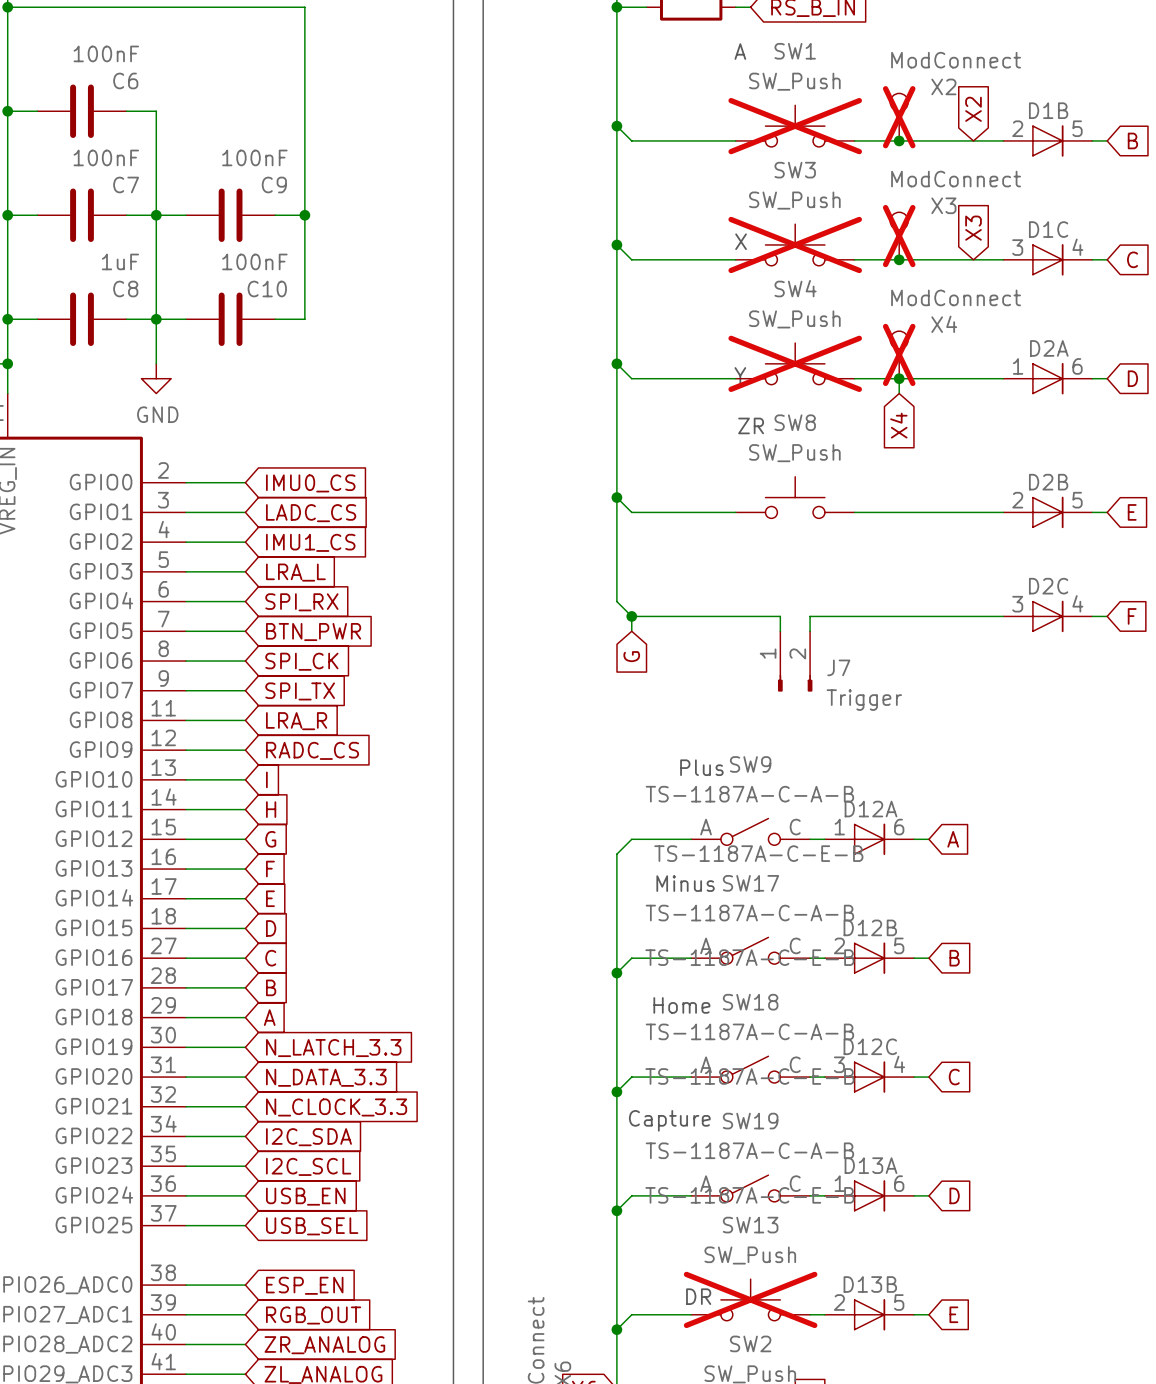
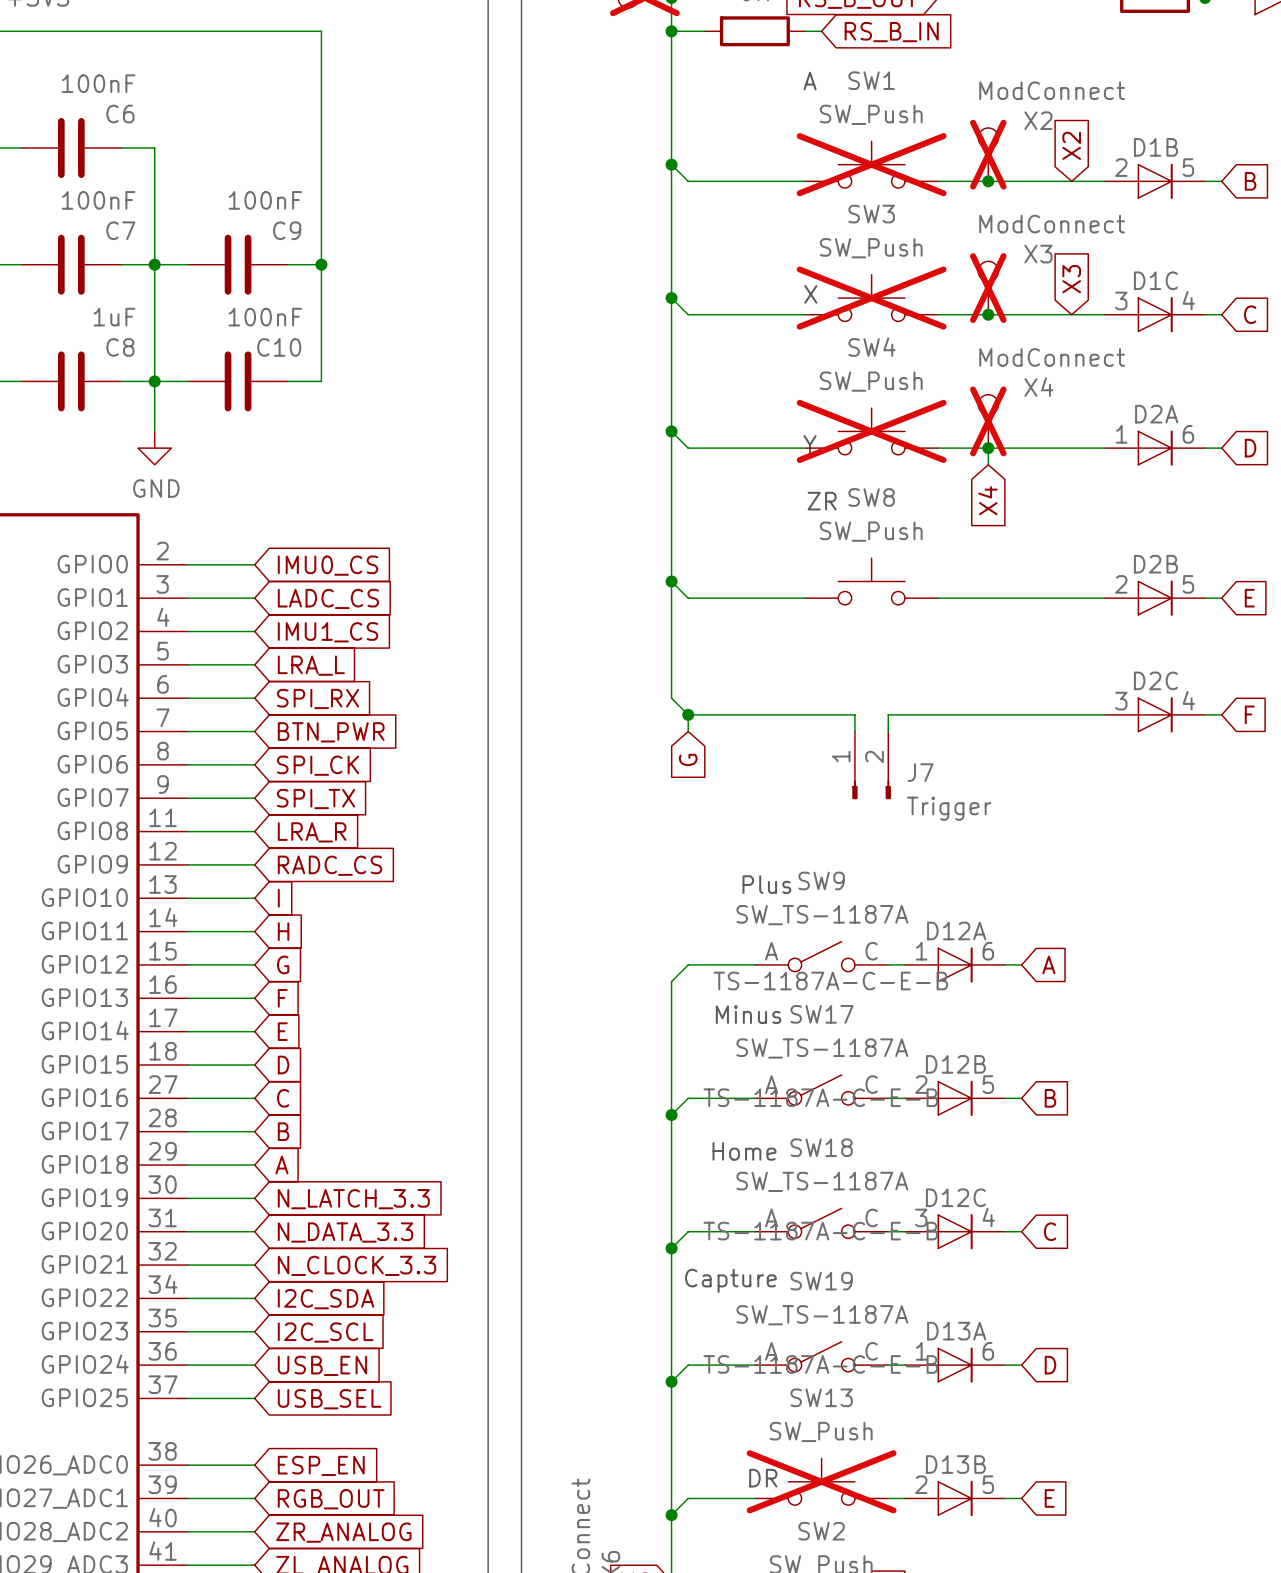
SW9 value: TS-1187A-C-A-B (749, 794) -> SW_TS-1187A (822, 915)
SW17 value: TS-1187A-C-A-B (749, 913) -> SW_TS-1187A (822, 1048)
SW18 value: TS-1187A-C-A-B (749, 1031) -> SW_TS-1187A (822, 1181)
SW19 value: TS-1187A-C-A-B (749, 1150) -> SW_TS-1187A (822, 1315)

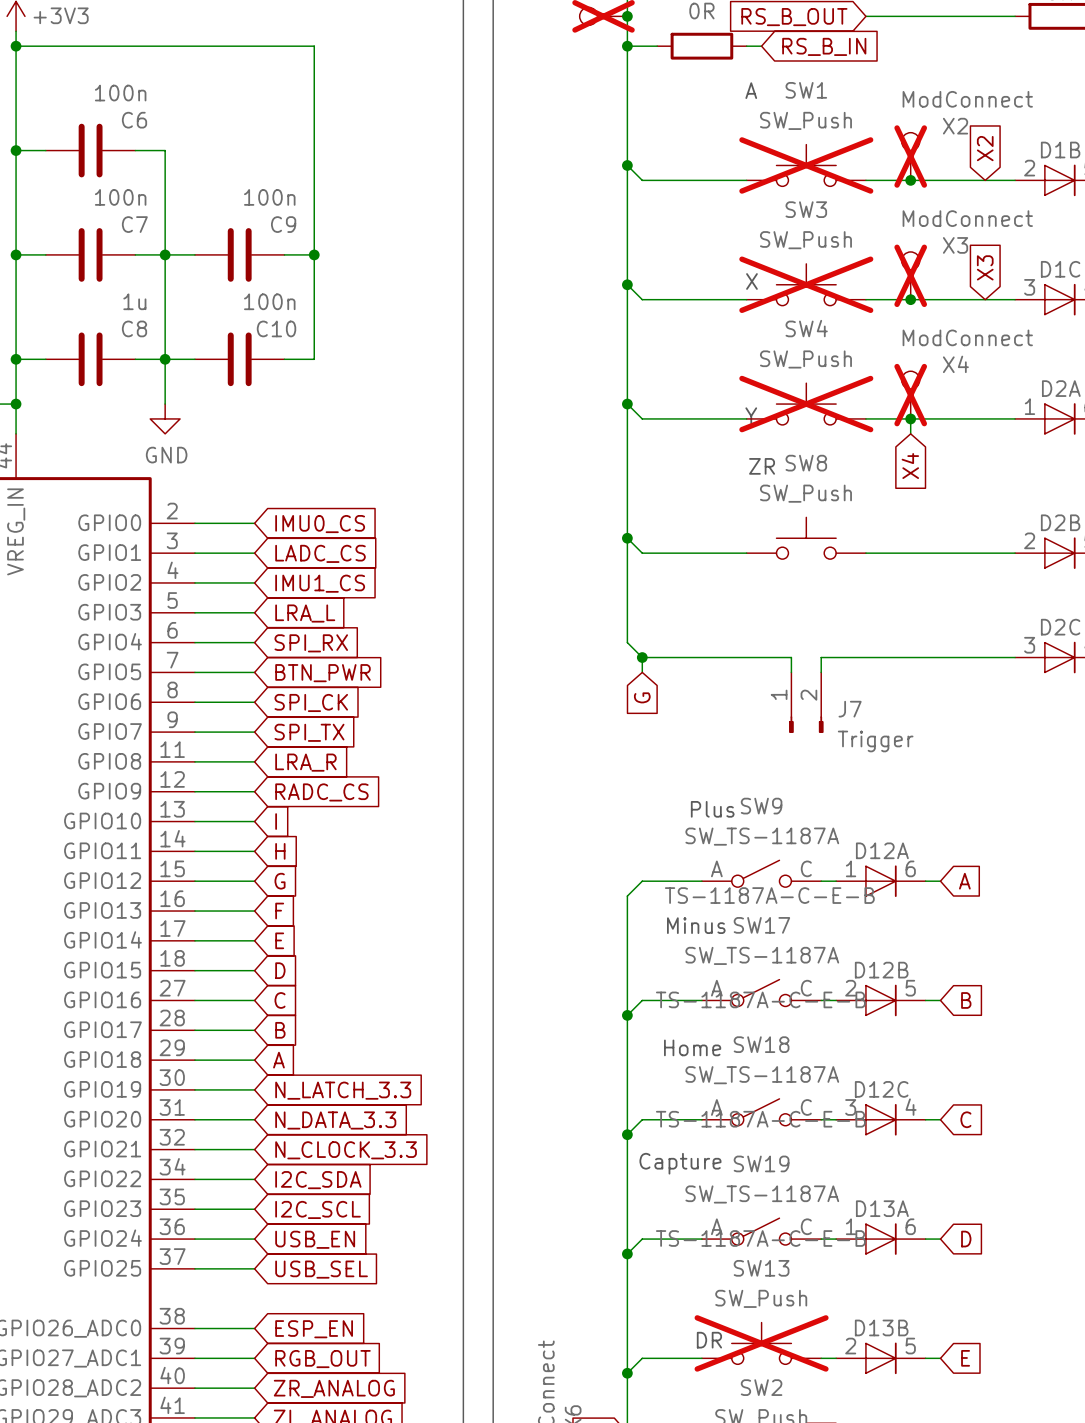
C6 value: 100nF (98, 83) -> 100n (120, 93)
C7 value: 100nF (98, 200) -> 100n (120, 197)
C9 value: 100nF (265, 200) -> 100n (269, 197)
C8 value: 1uF (114, 317) -> 1u (134, 301)
C10 value: 100nF (265, 317) -> 100n (269, 301)

